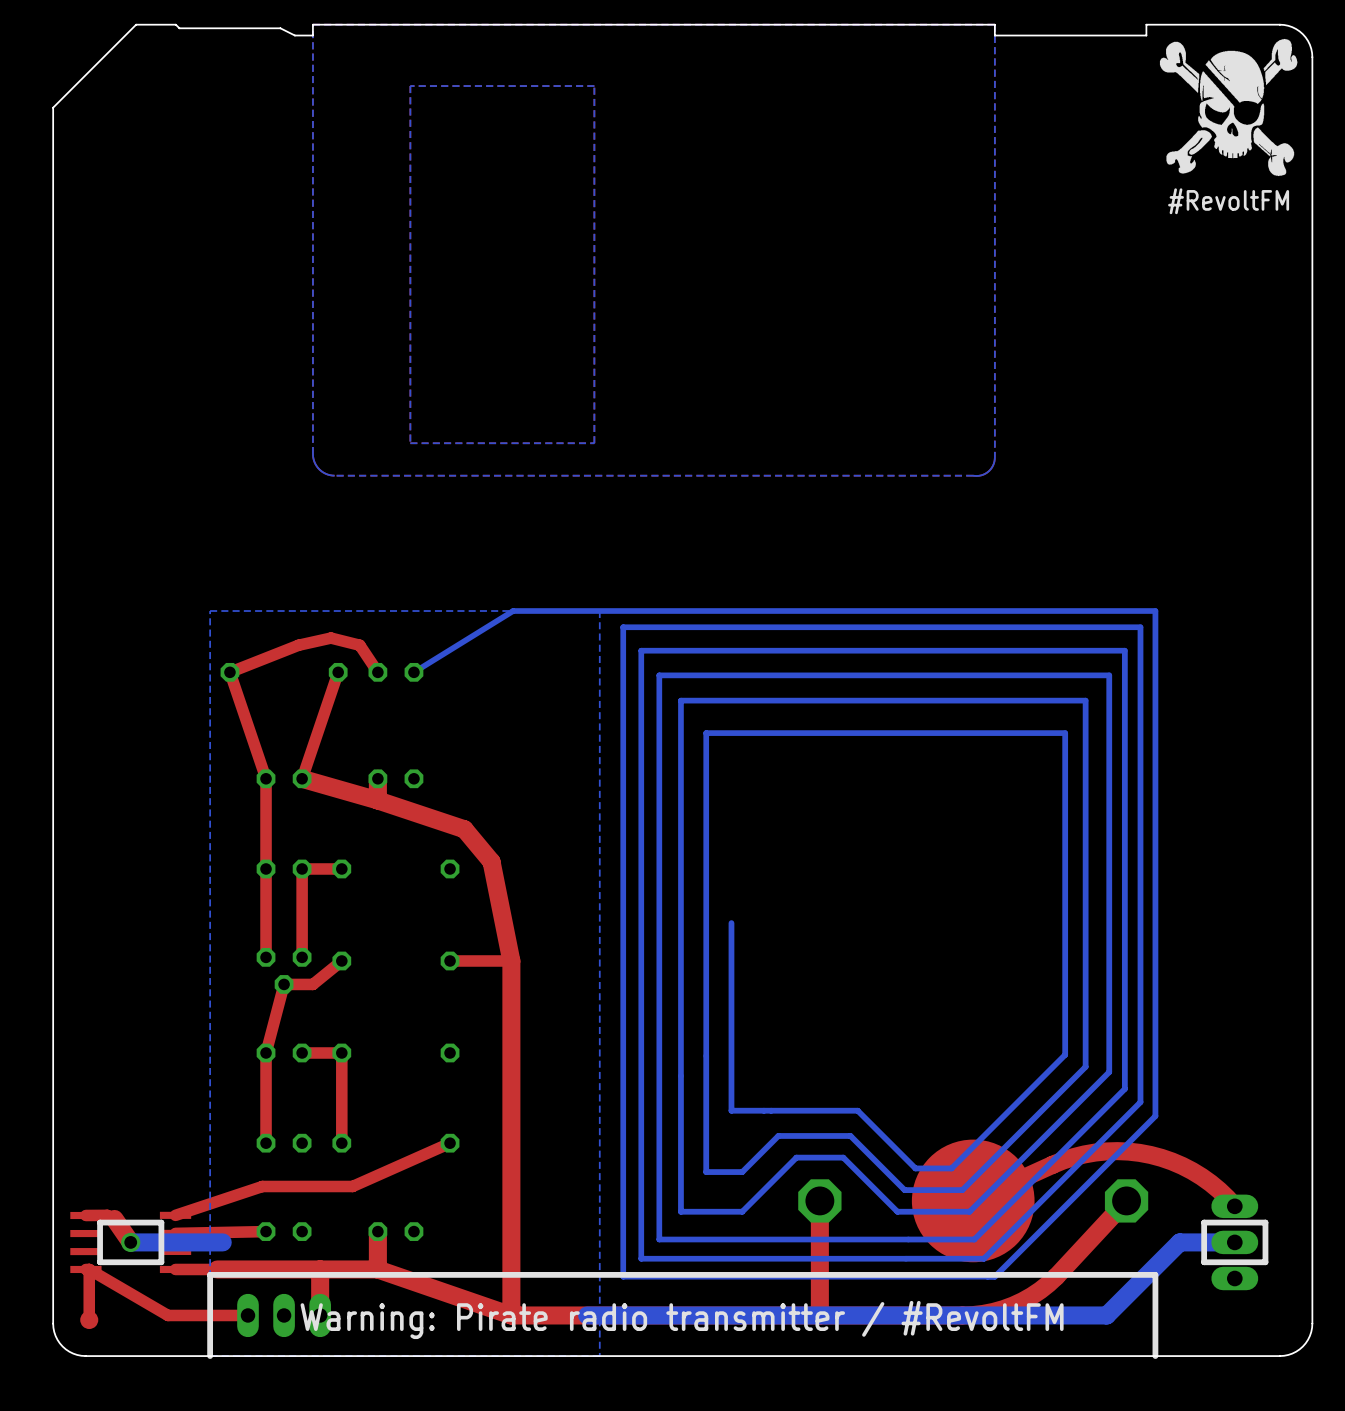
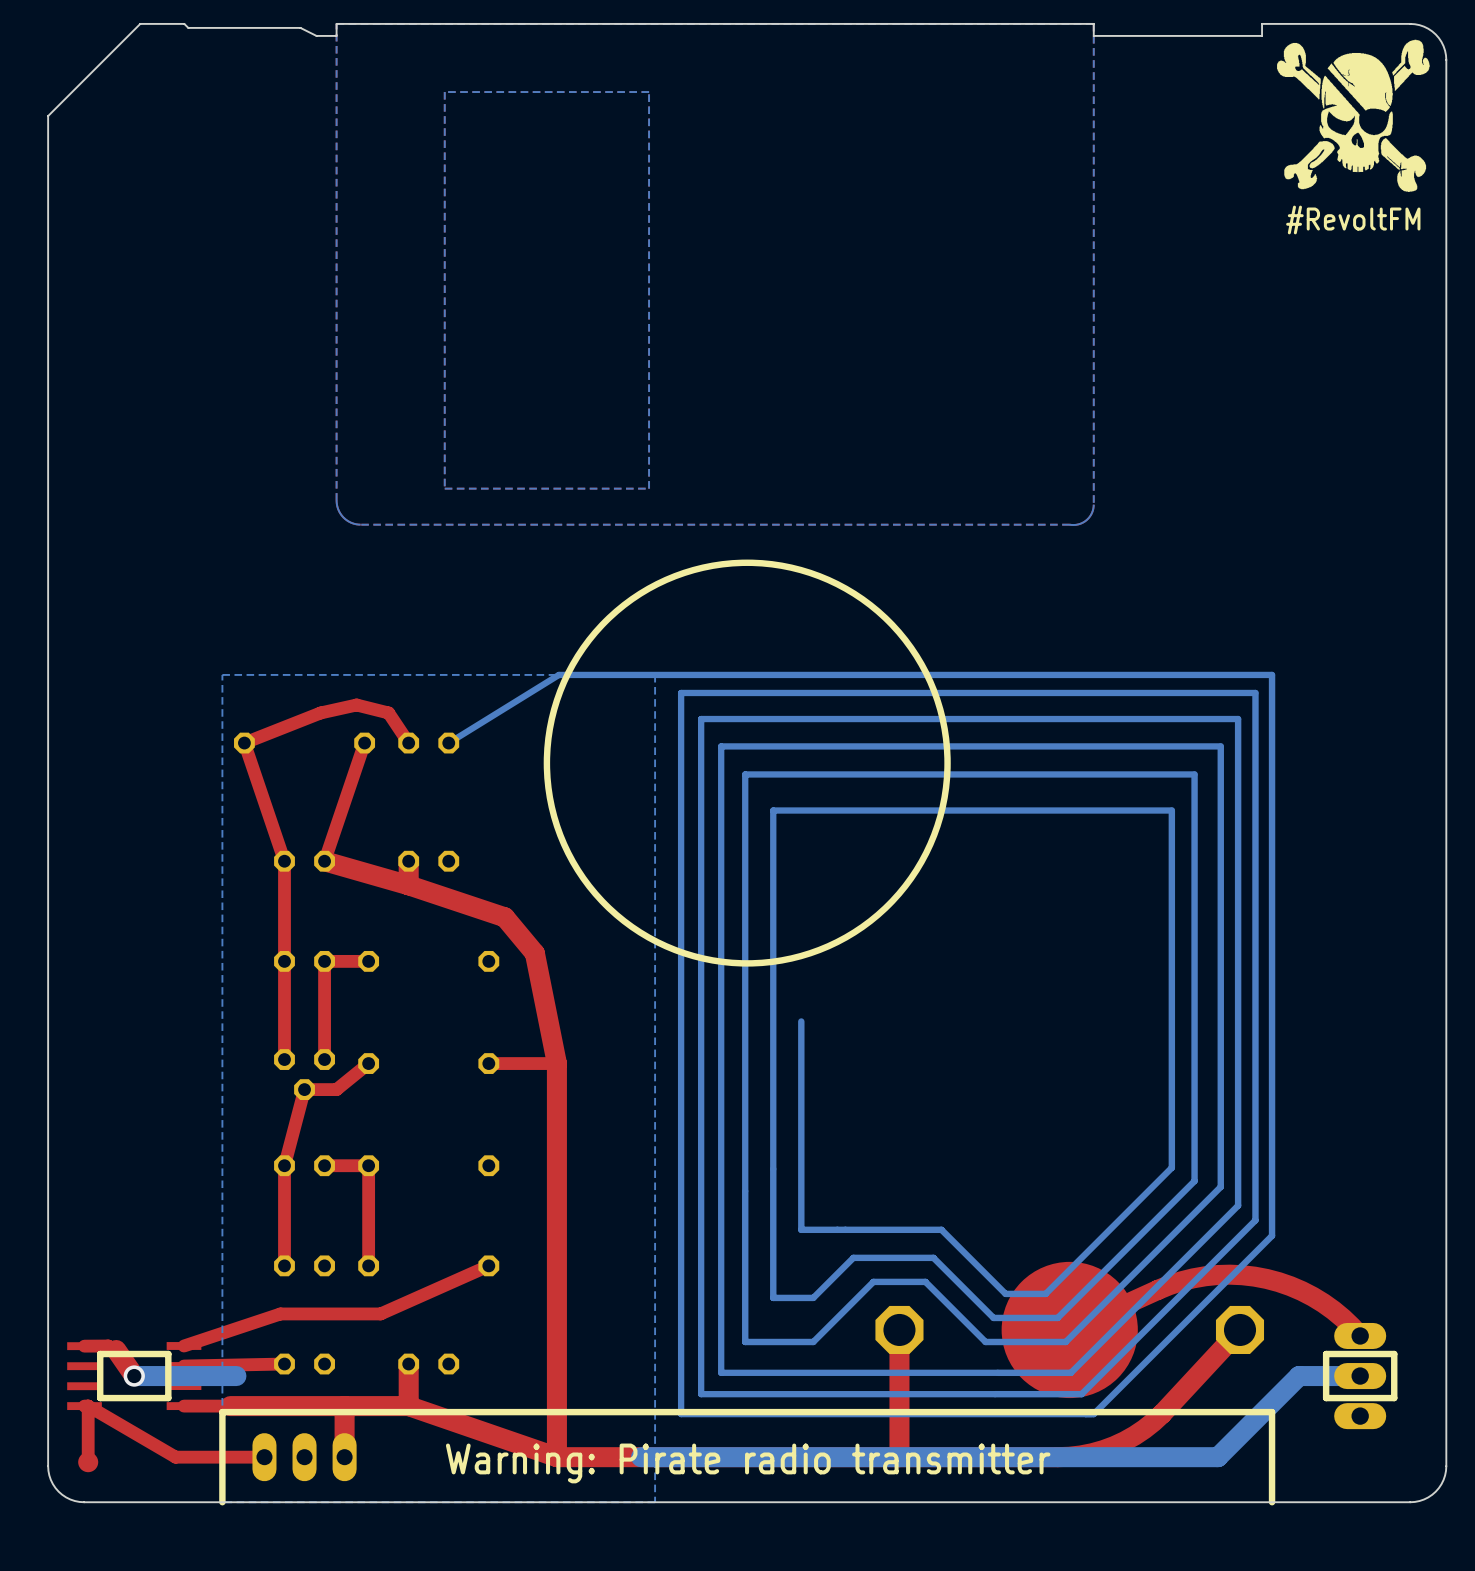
drawing: none -> [543, 559, 951, 967]
text: Warning: Pirate radio transmitter / #RevoltFM (682, 1319) -> Warning: Pirate radio transmitter (748, 1463)

